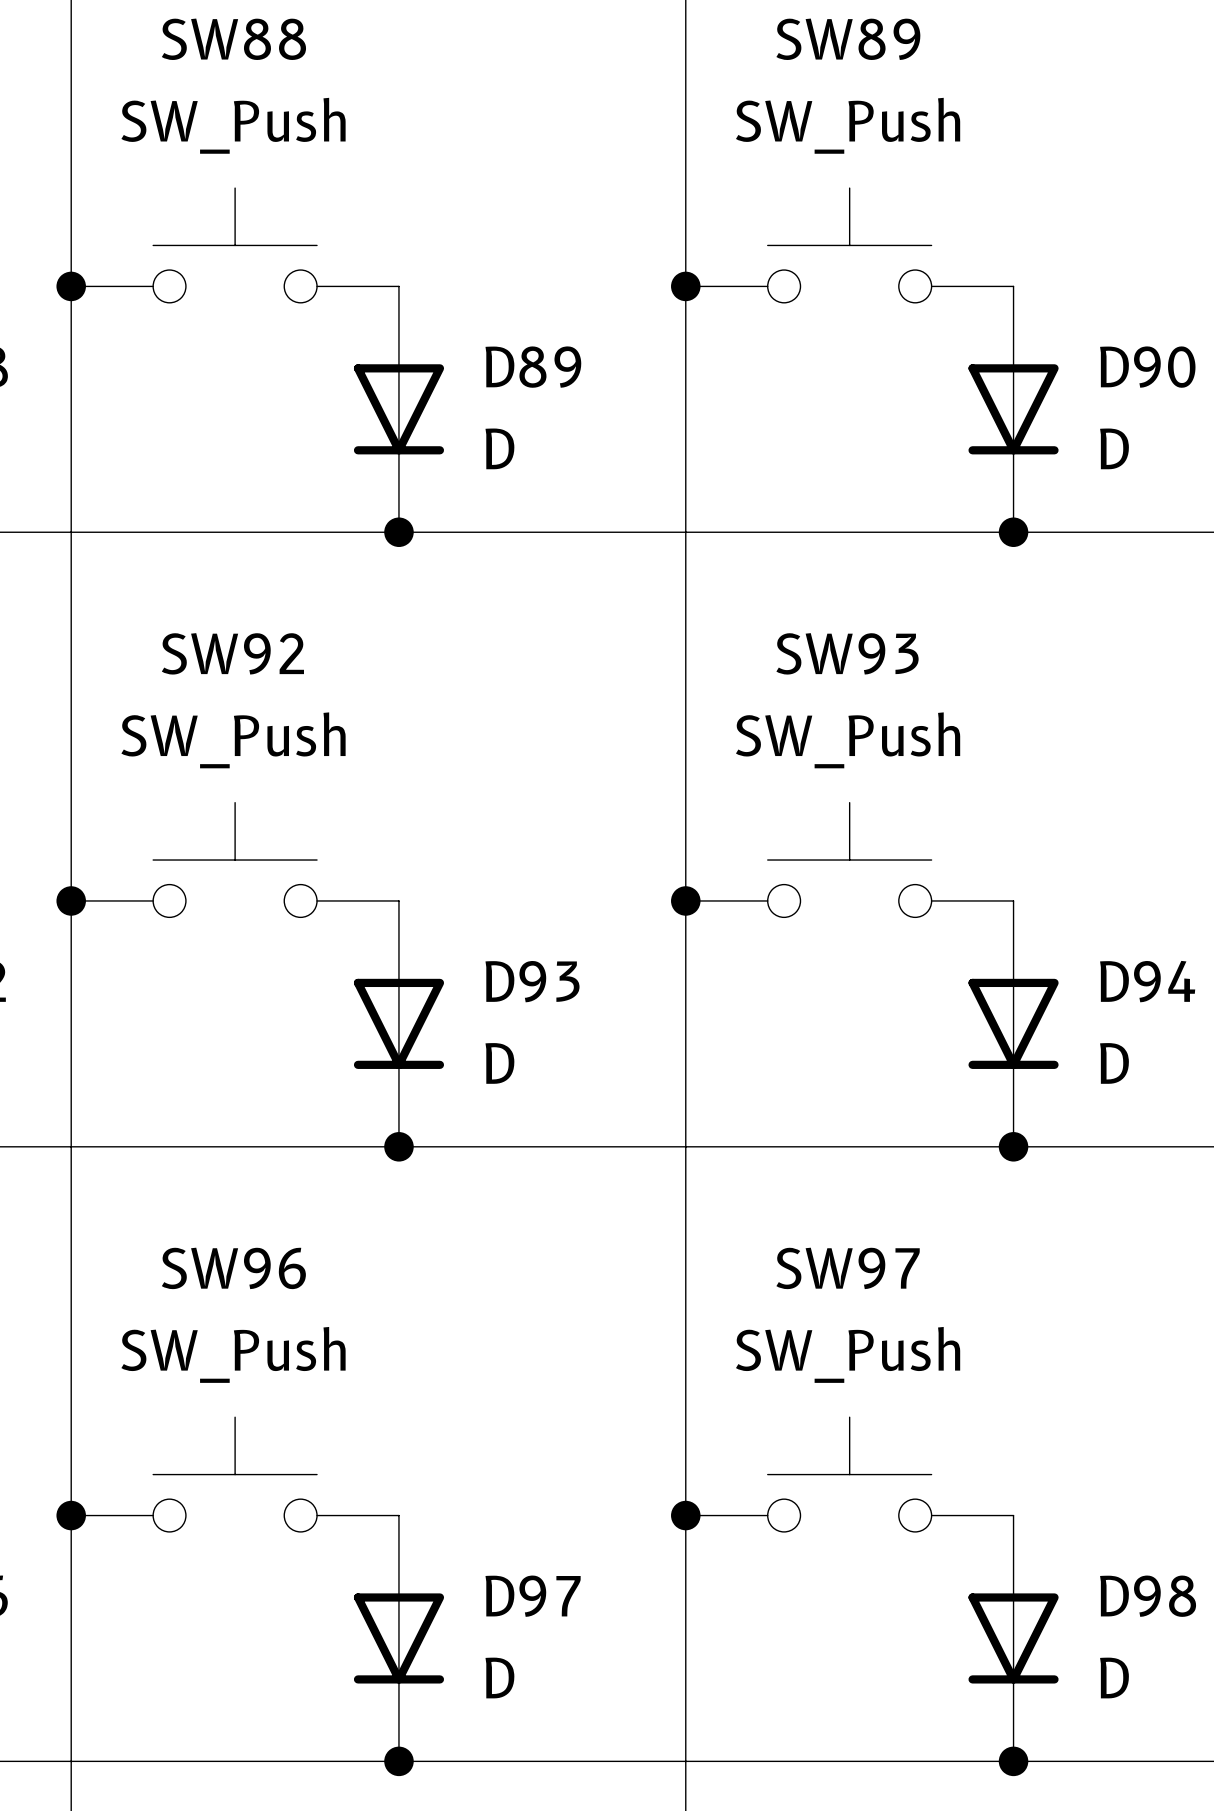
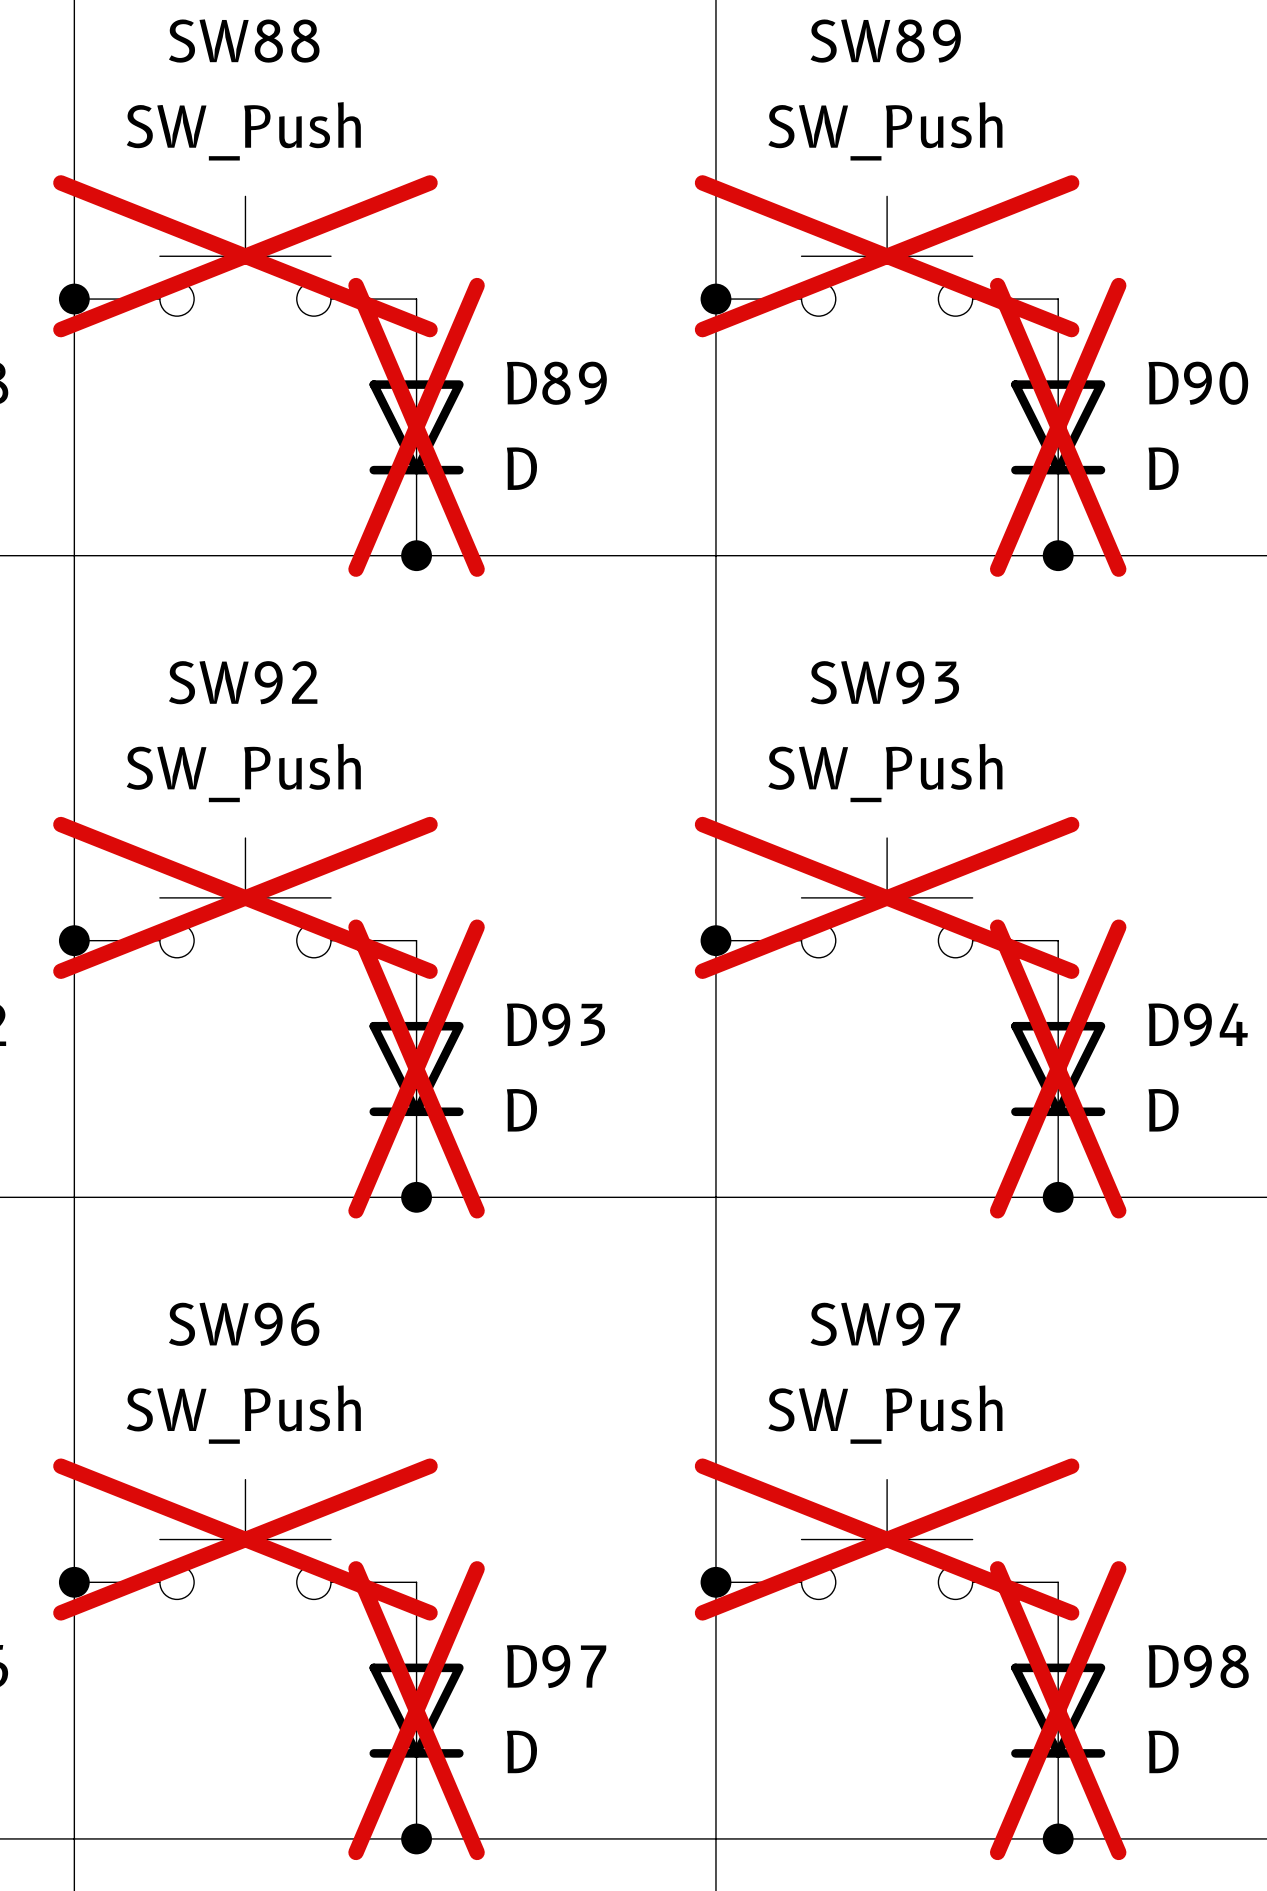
SW88 do-not-place cross: none -> (245, 256)
SW89 do-not-place cross: none -> (887, 256)
D89 do-not-place cross: none -> (416, 427)
D90 do-not-place cross: none -> (1058, 427)
SW92 do-not-place cross: none -> (245, 897)
SW93 do-not-place cross: none -> (887, 897)
D93 do-not-place cross: none -> (416, 1069)
D94 do-not-place cross: none -> (1058, 1069)
SW96 do-not-place cross: none -> (245, 1539)
SW97 do-not-place cross: none -> (887, 1539)
D97 do-not-place cross: none -> (416, 1710)
D98 do-not-place cross: none -> (1058, 1710)

